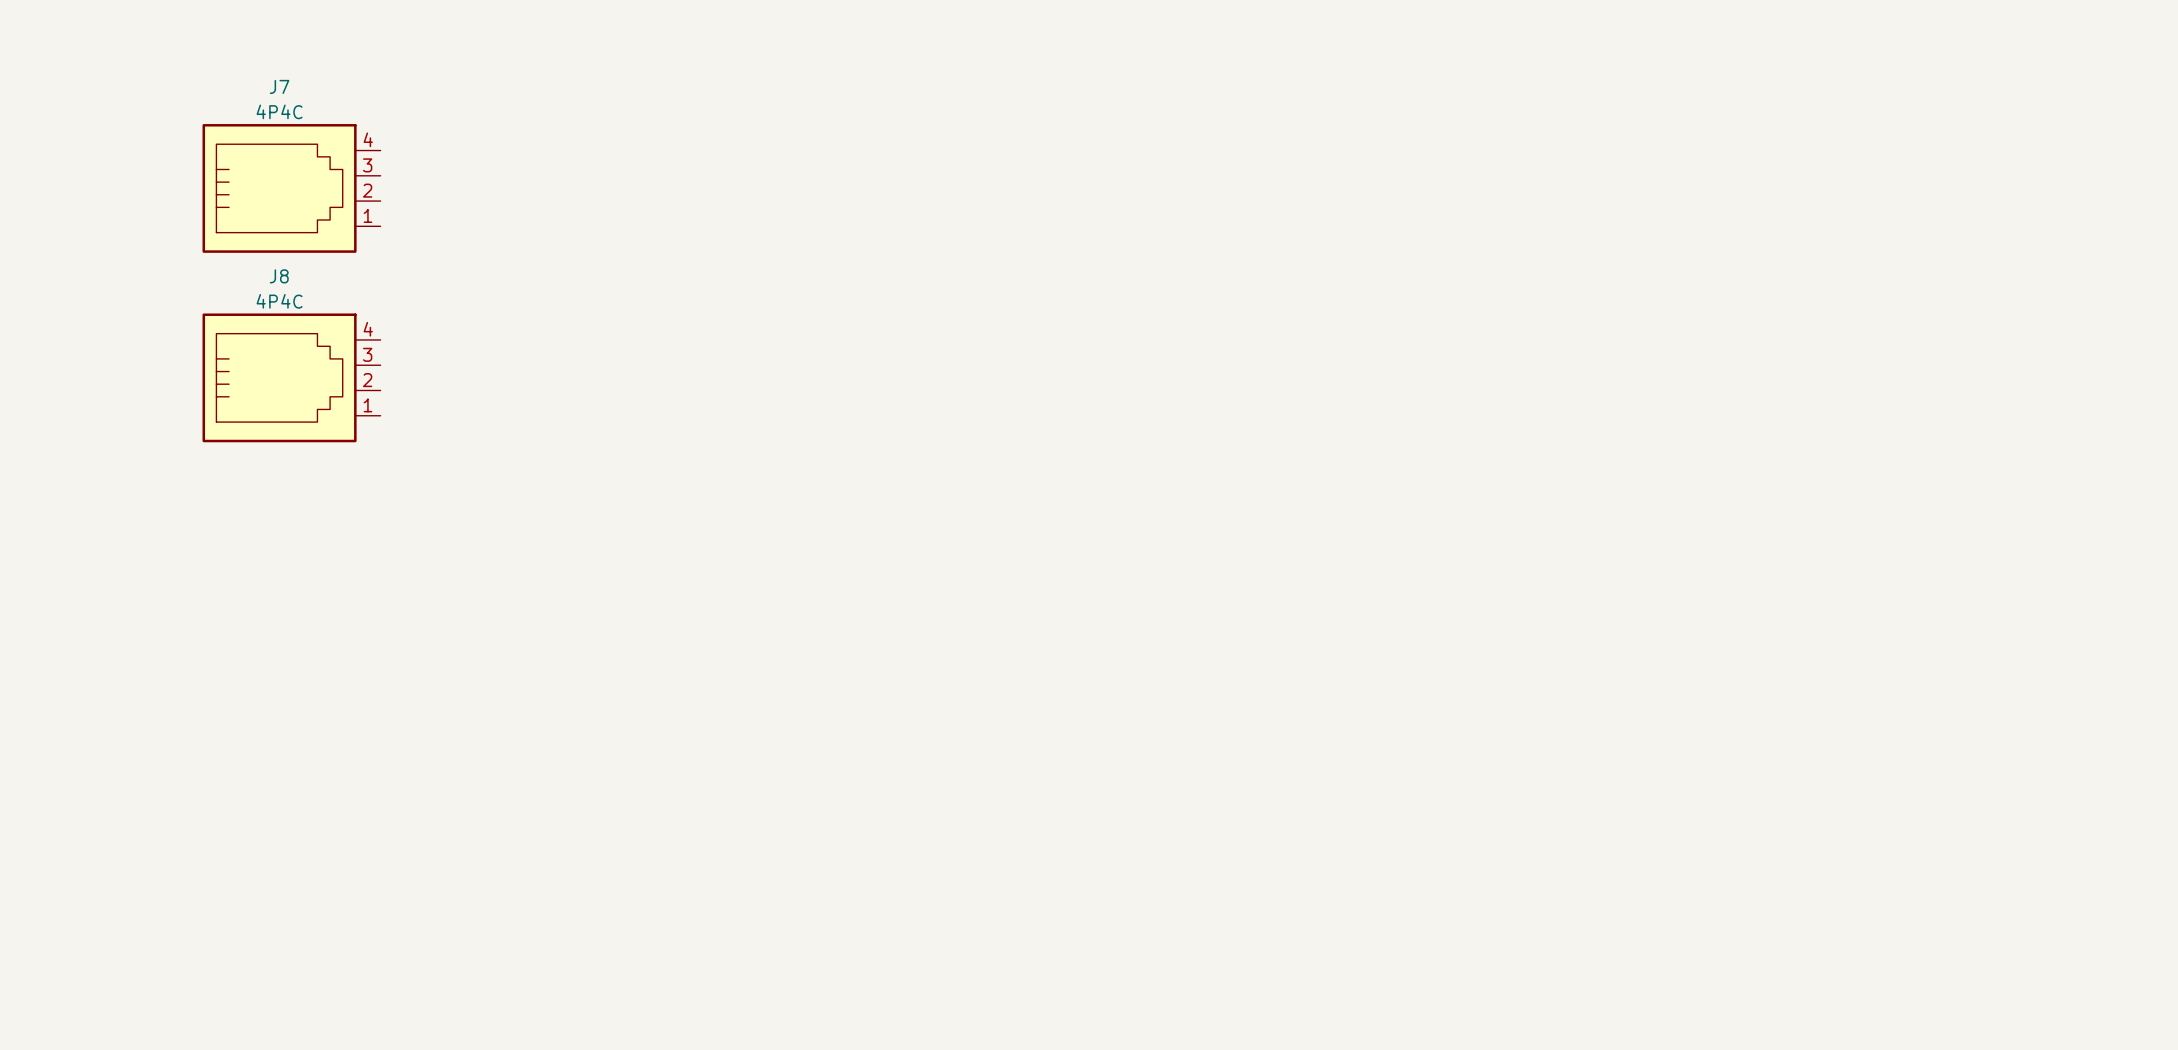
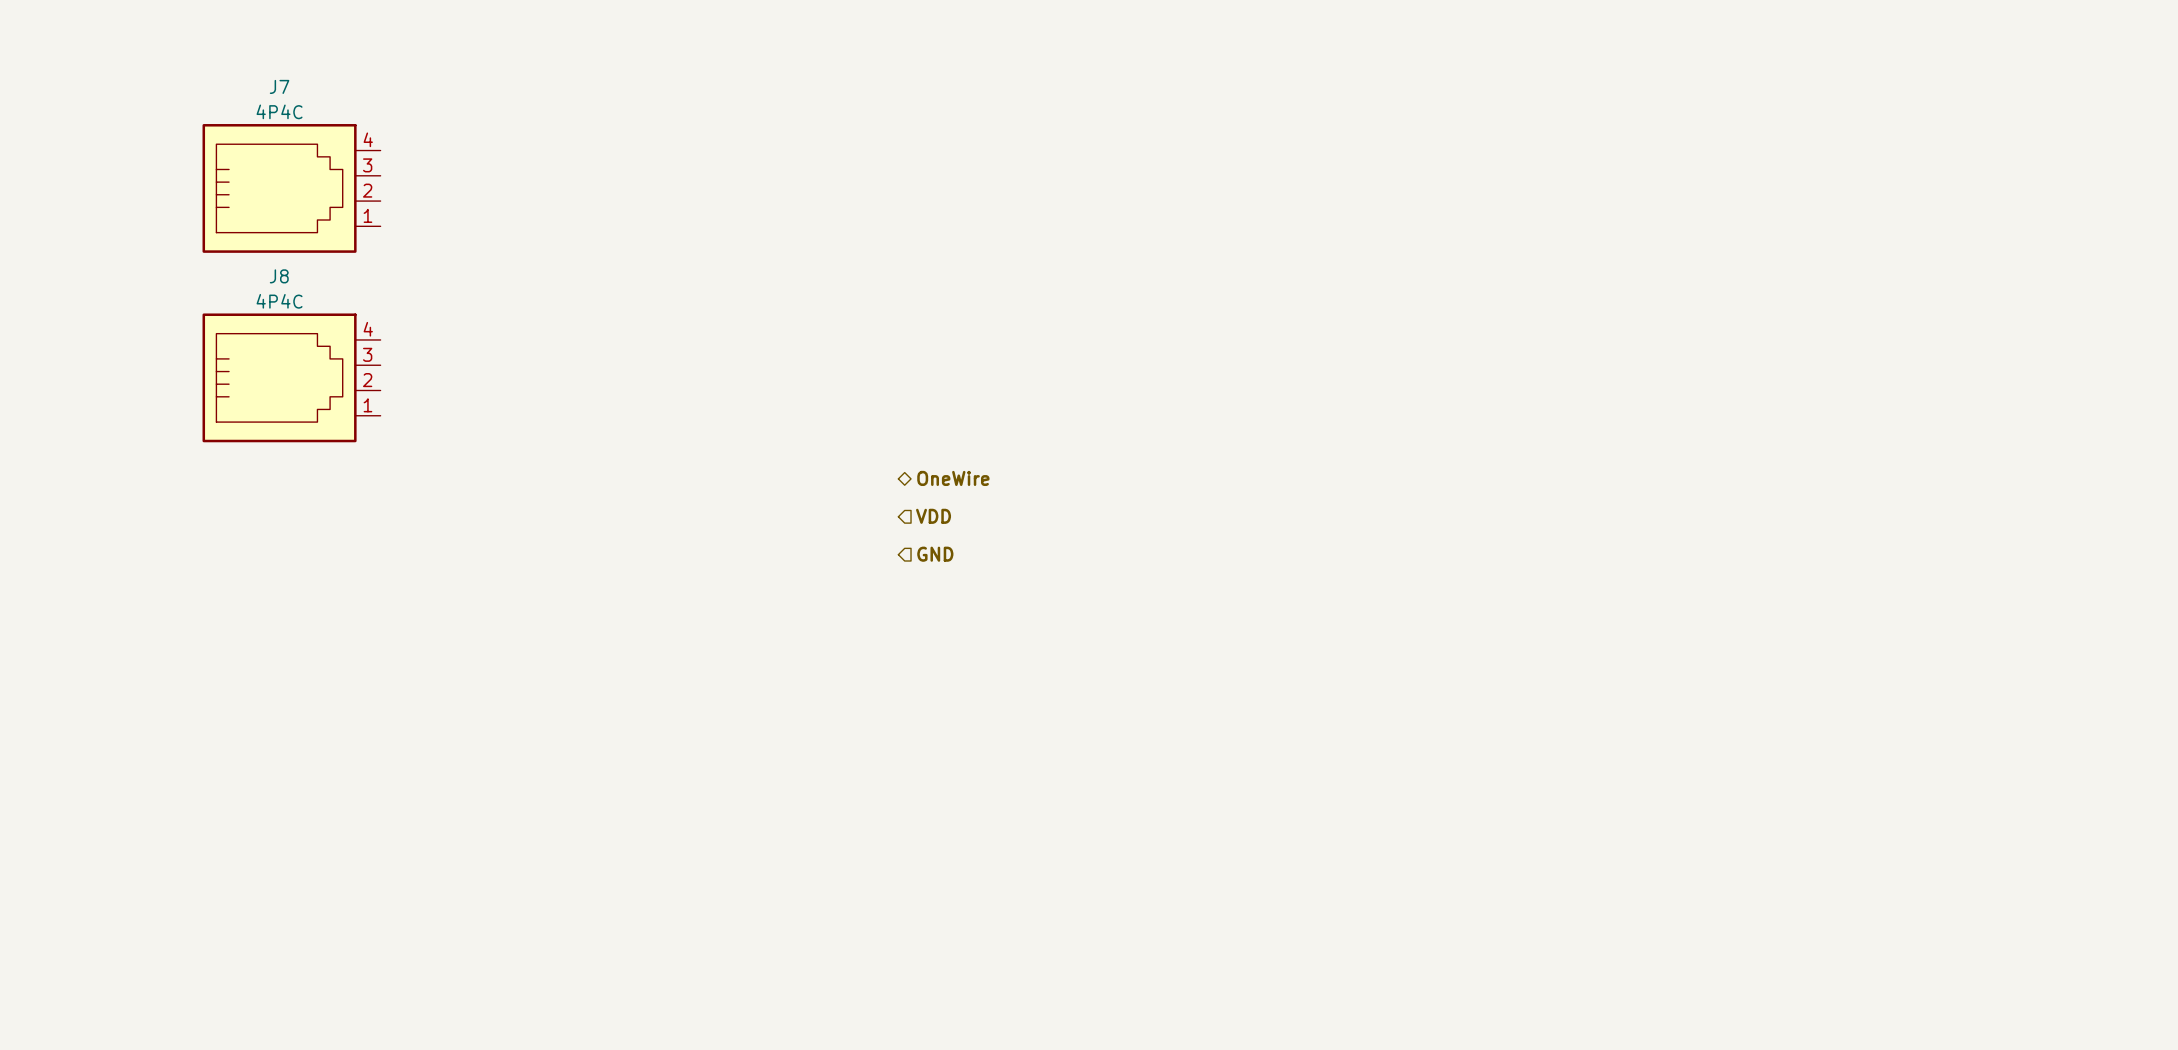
hierarchical label: none -> OneWire (953, 478)
hierarchical label: none -> VDD (933, 516)
hierarchical label: none -> GND (935, 554)

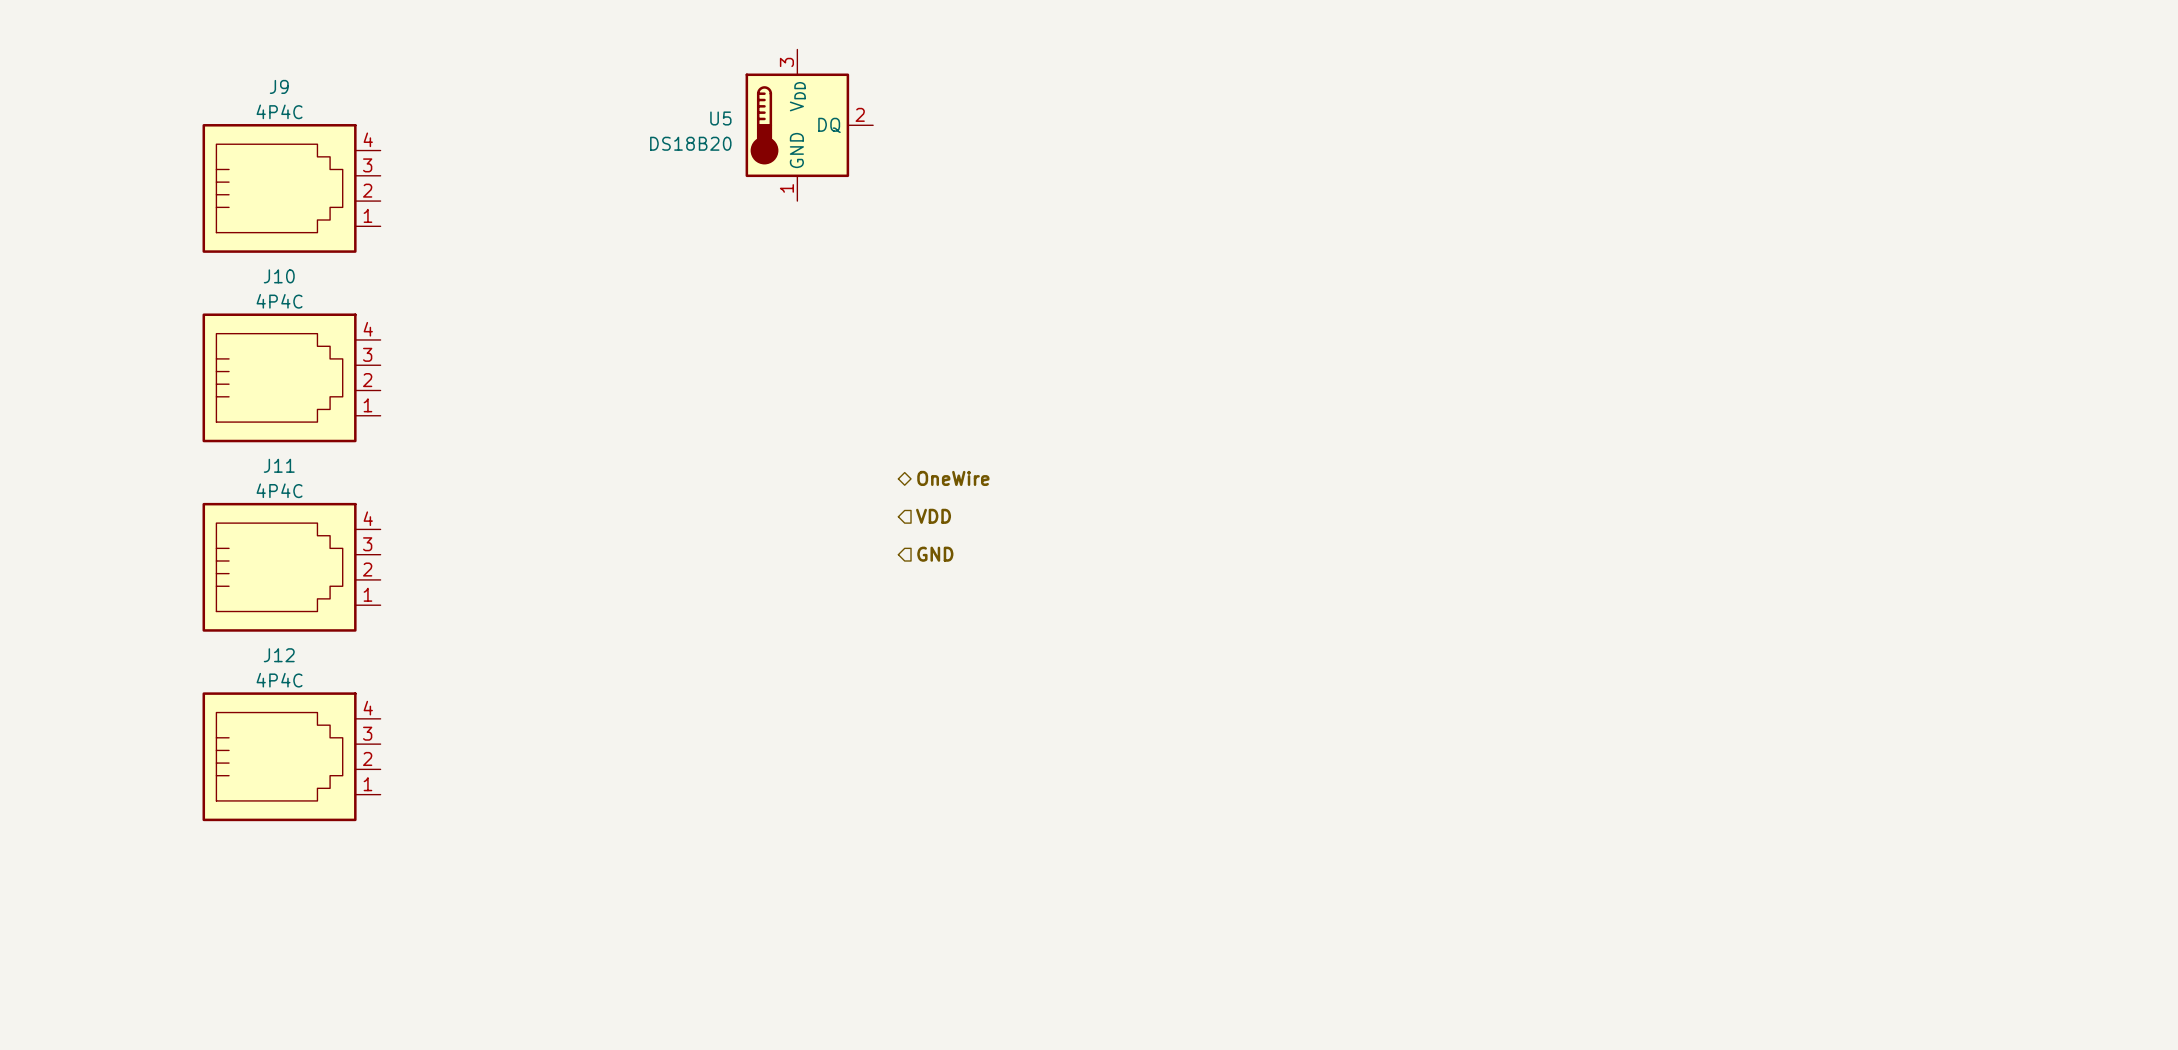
J7 name: J7 (279, 86) -> J9 (279, 86)
U5: none -> DS18B20 (809, 125)
J8 name: J8 (279, 276) -> J10 (279, 276)
J11: none -> 4P4C (291, 567)
J12: none -> 4P4C (291, 756)

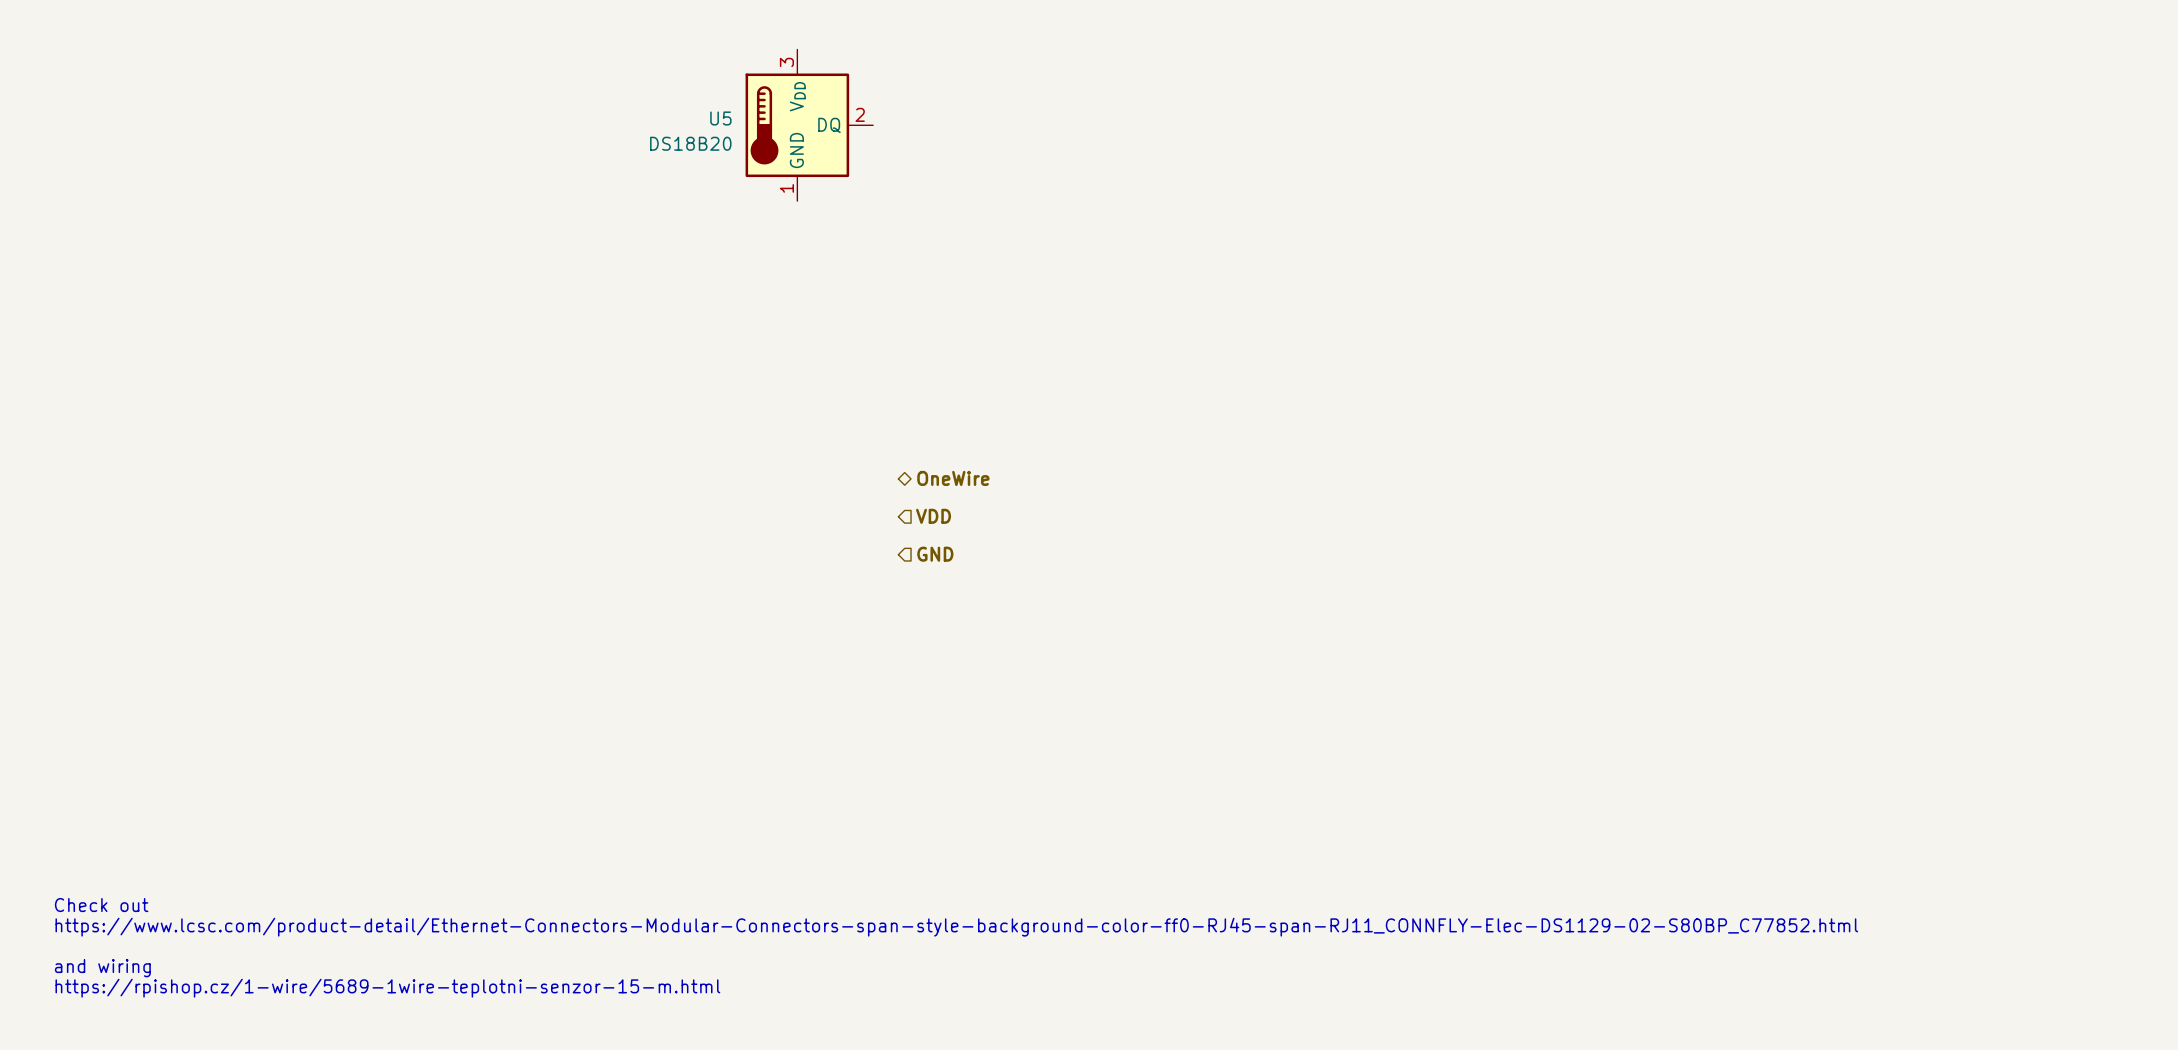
J9: 4P4C (291, 188) -> none
J10: 4P4C (291, 377) -> none
J11: 4P4C (291, 567) -> none
J12: 4P4C (291, 756) -> none
text: none -> Check out (101, 905)
text: none -> https://www.lcsc.com/product-detail/Ethernet-Connectors-Modular-Connectors-span-style-background-color-ff0-RJ45-span-RJ11_CONNFLY-Elec-DS1129-02-S80BP_C77852.html (956, 927)
text: none -> and wiring (102, 968)
text: none -> https://rpishop.cz/1-wire/5689-1wire-teplotni-senzor-15-m.html (387, 988)

